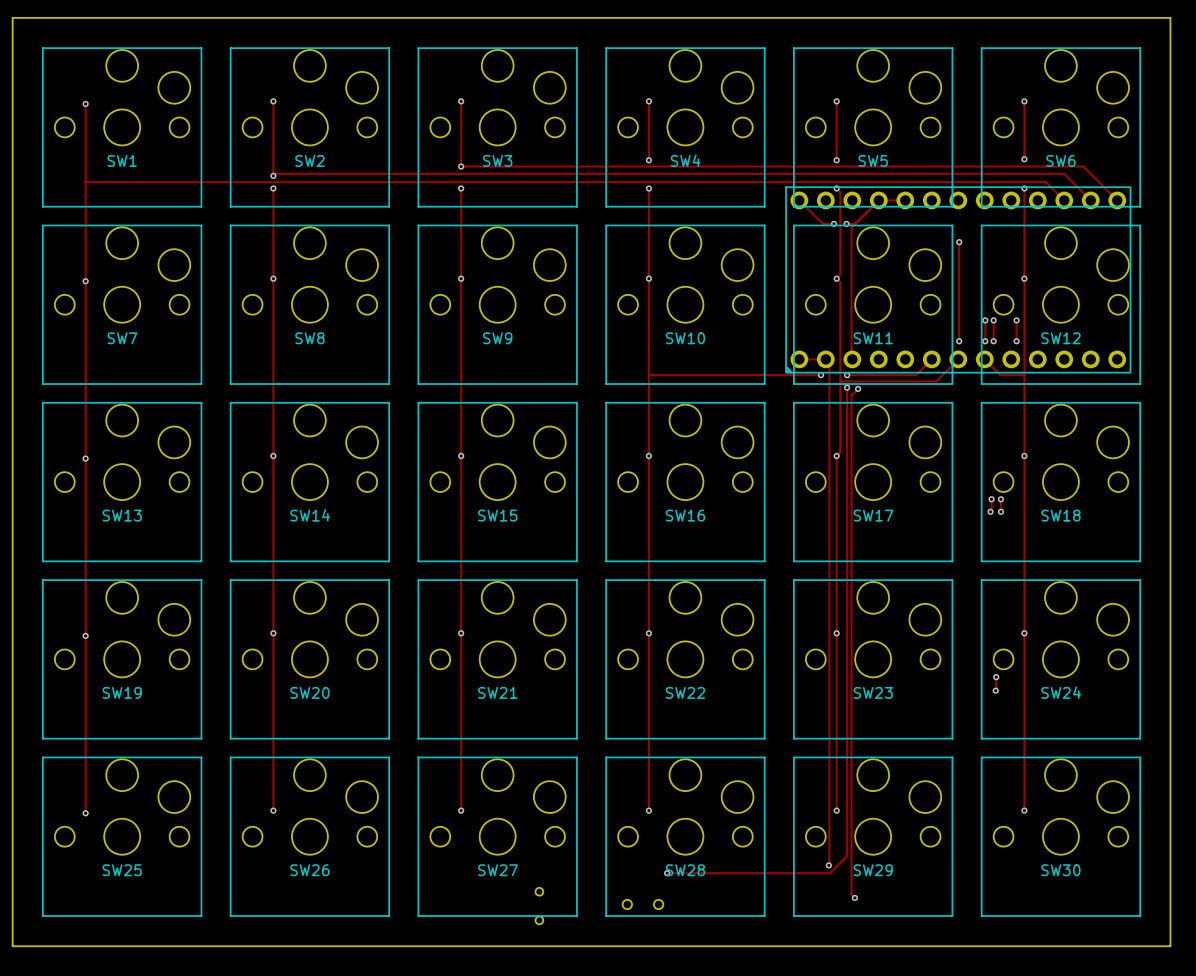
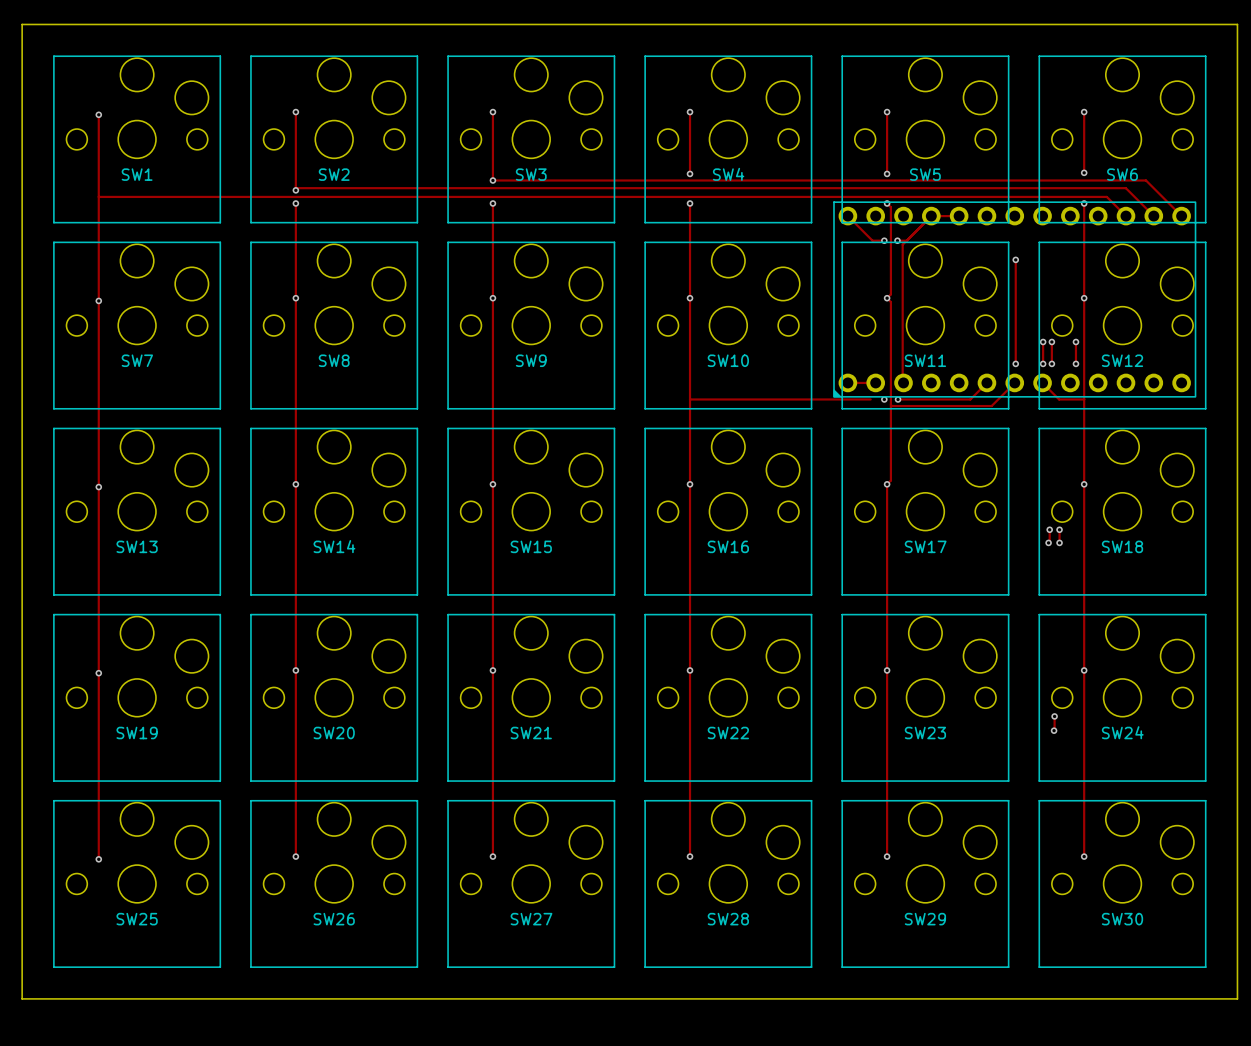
track: (825, 359) (829, 362) (828, 865) -> none
via: (821, 375) -> none
via: none -> (884, 399)
track: (847, 387) (847, 856) (829, 873) (667, 873) -> none
via: (847, 387) -> none
track: (858, 388) (851, 395) (851, 894) (854, 897) -> none
via: (858, 388) -> none
via: (828, 865) -> none
via: (667, 873) -> none
via: (854, 897) -> none
part: (642, 904) -> none
part: (539, 906) -> none

